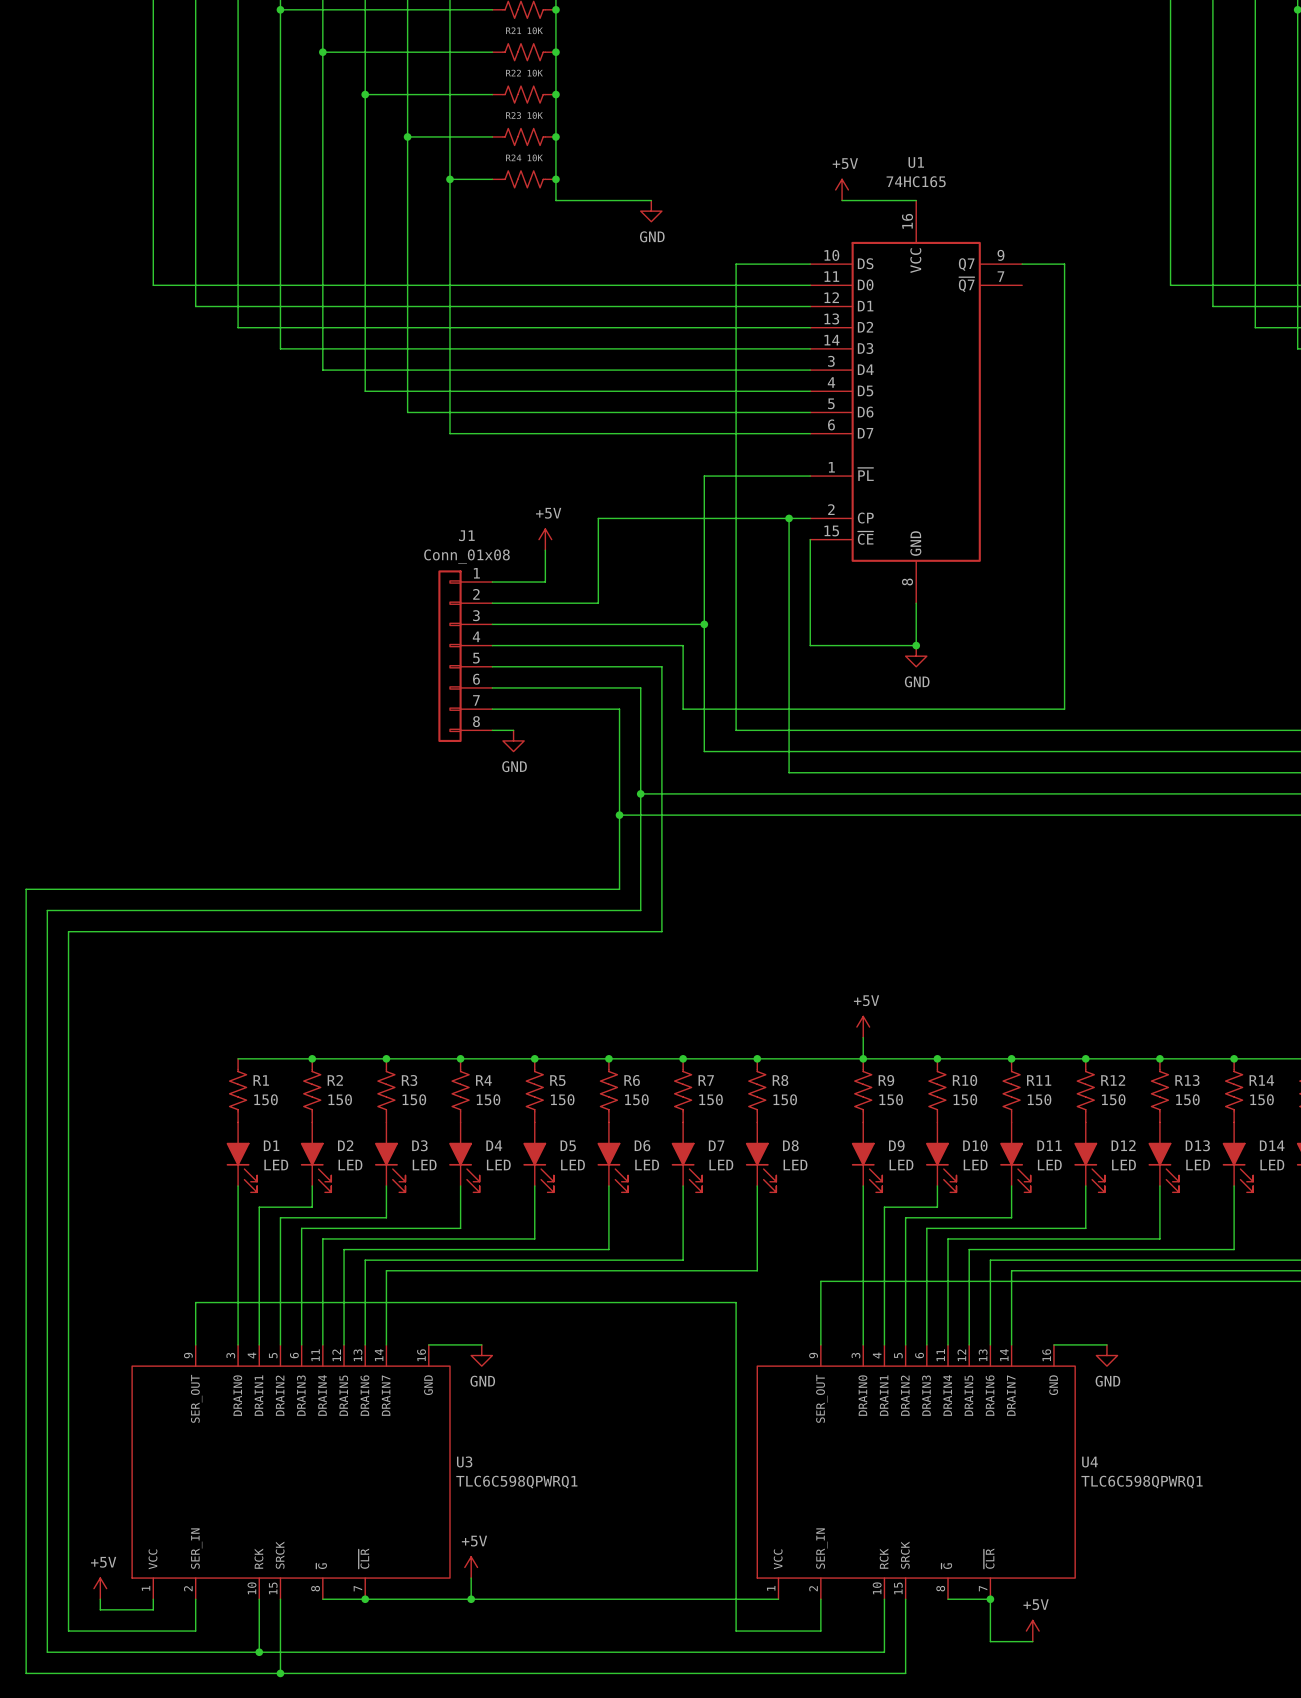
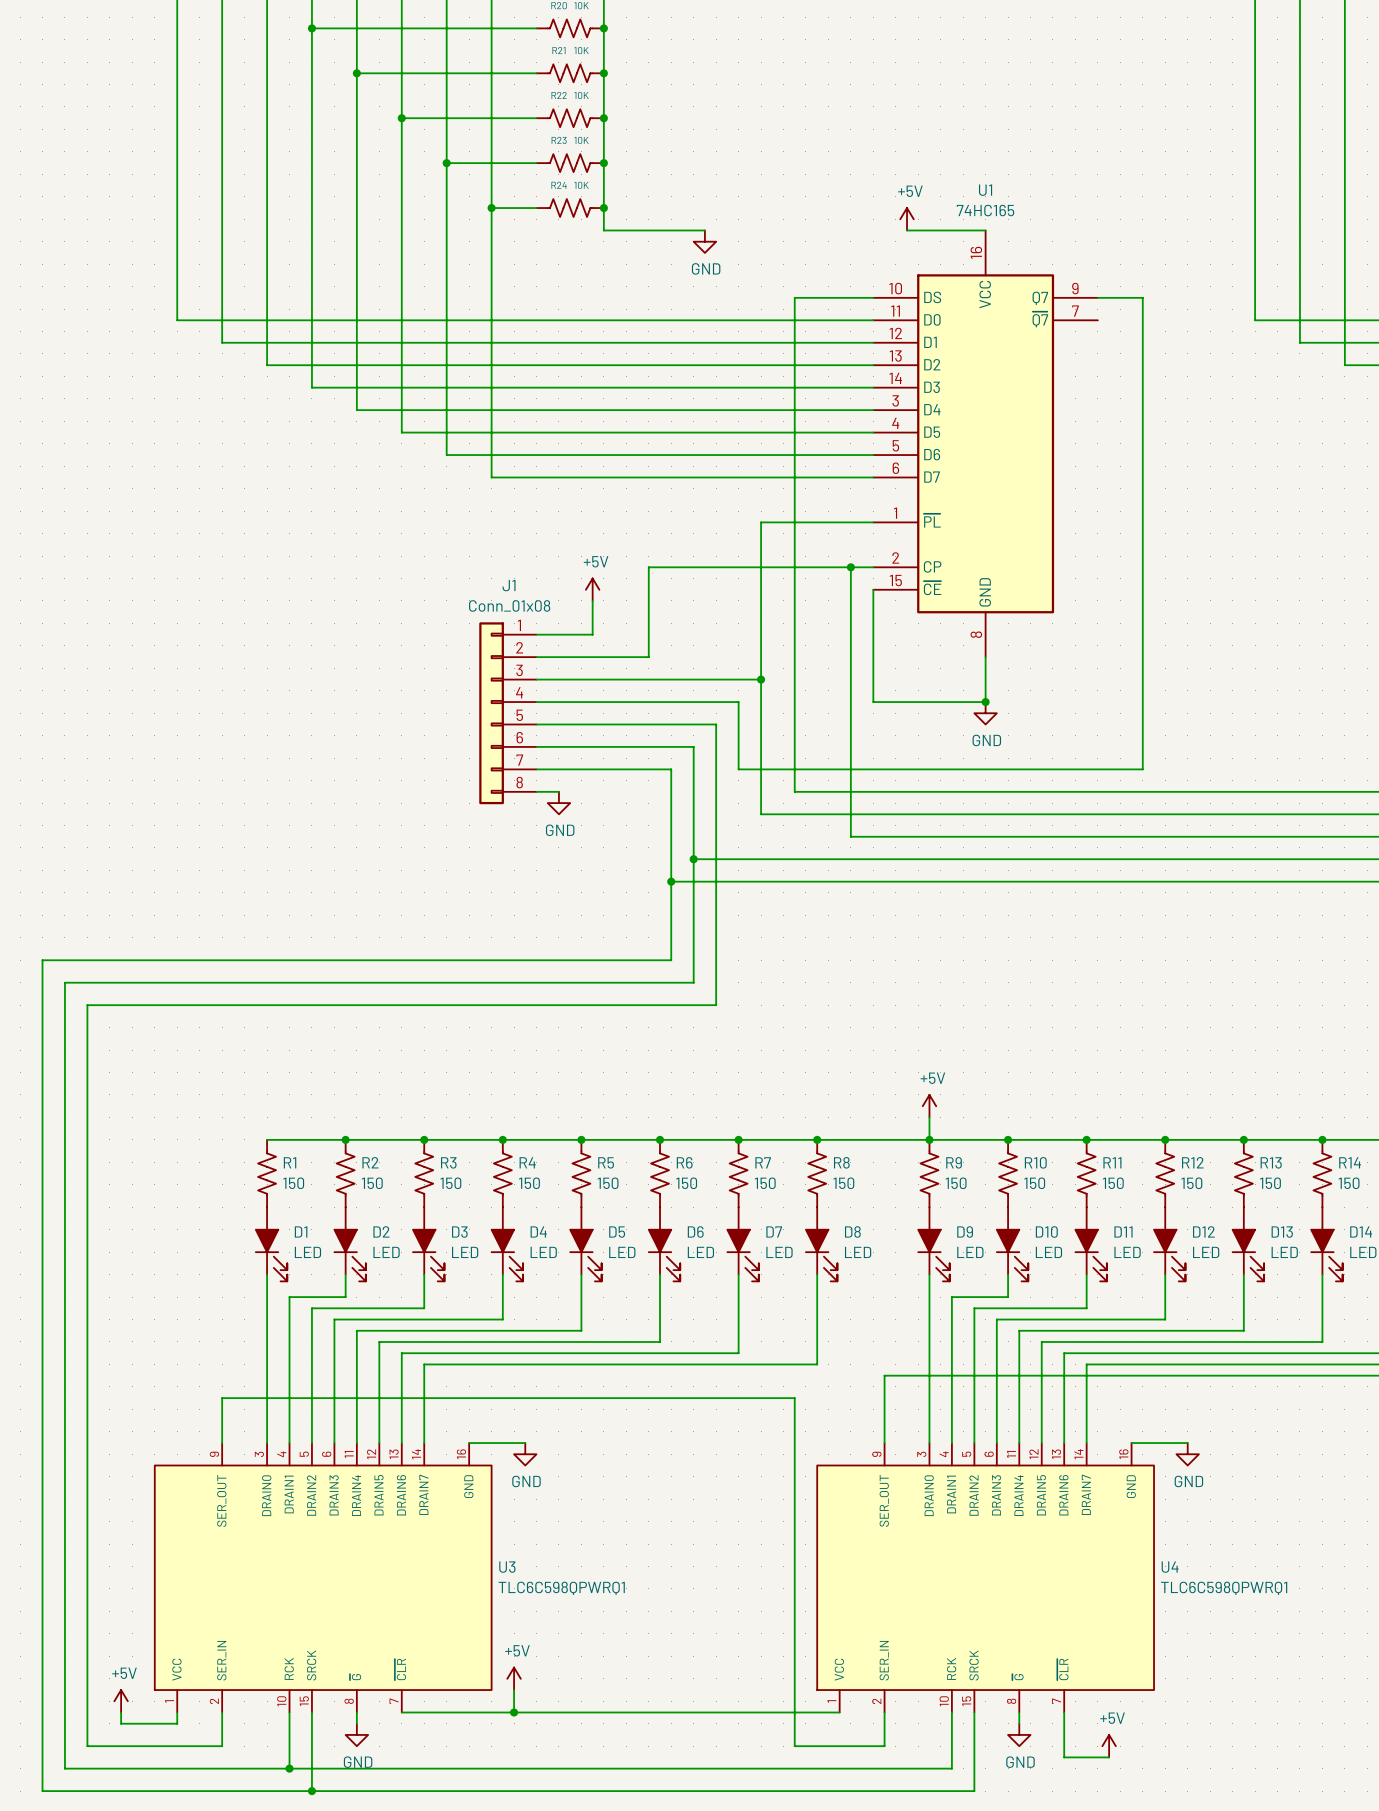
wire: (322, 1599) (365, 1599) -> (356, 1712) (356, 1723)
junction: (365, 1599) -> none
wire: (948, 1599) (990, 1599) -> (1019, 1712) (1019, 1723)
junction: (990, 1599) -> none
power symbol: none -> GND (356, 1734)
power symbol: none -> GND (1019, 1734)

